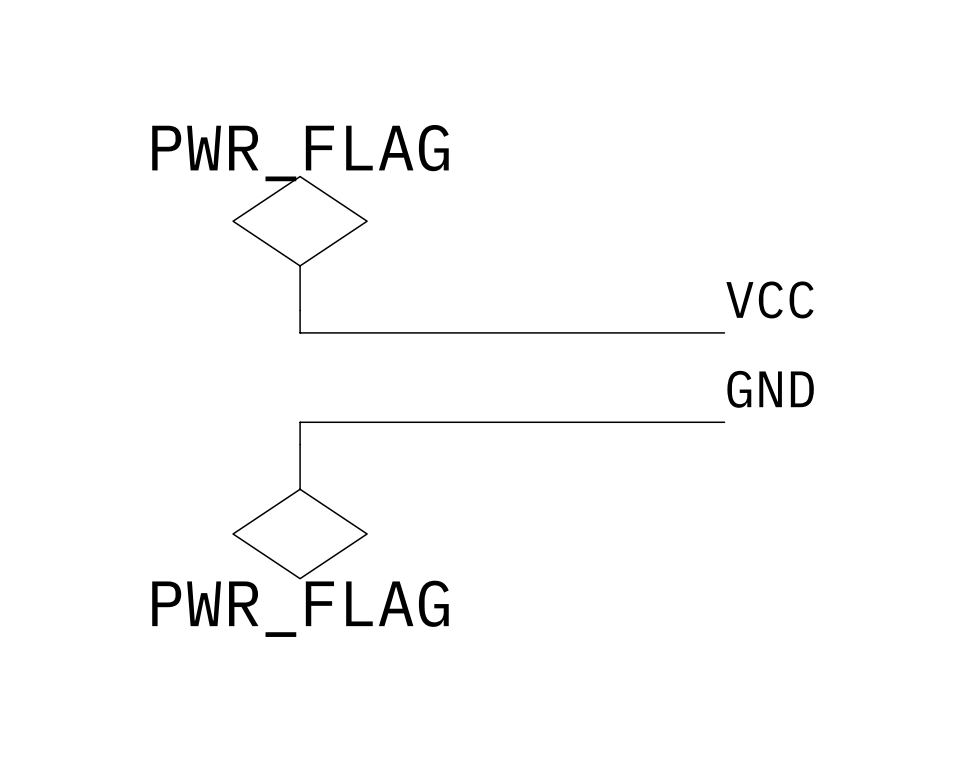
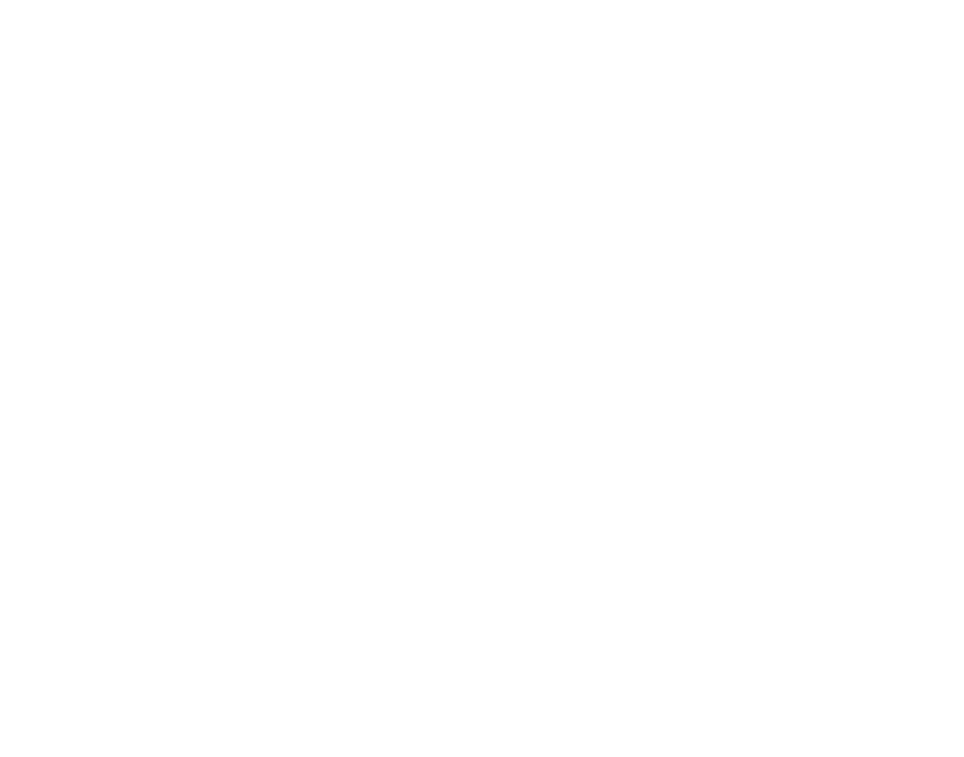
power symbol: PWR_FLAG (300, 243) -> none
label: VCC (769, 299) -> none
wire: (300, 310) (300, 332) (724, 332) -> none
label: GND (770, 389) -> none
wire: (724, 422) (300, 422) (300, 444) -> none
power symbol: PWR_FLAG (300, 511) -> none

